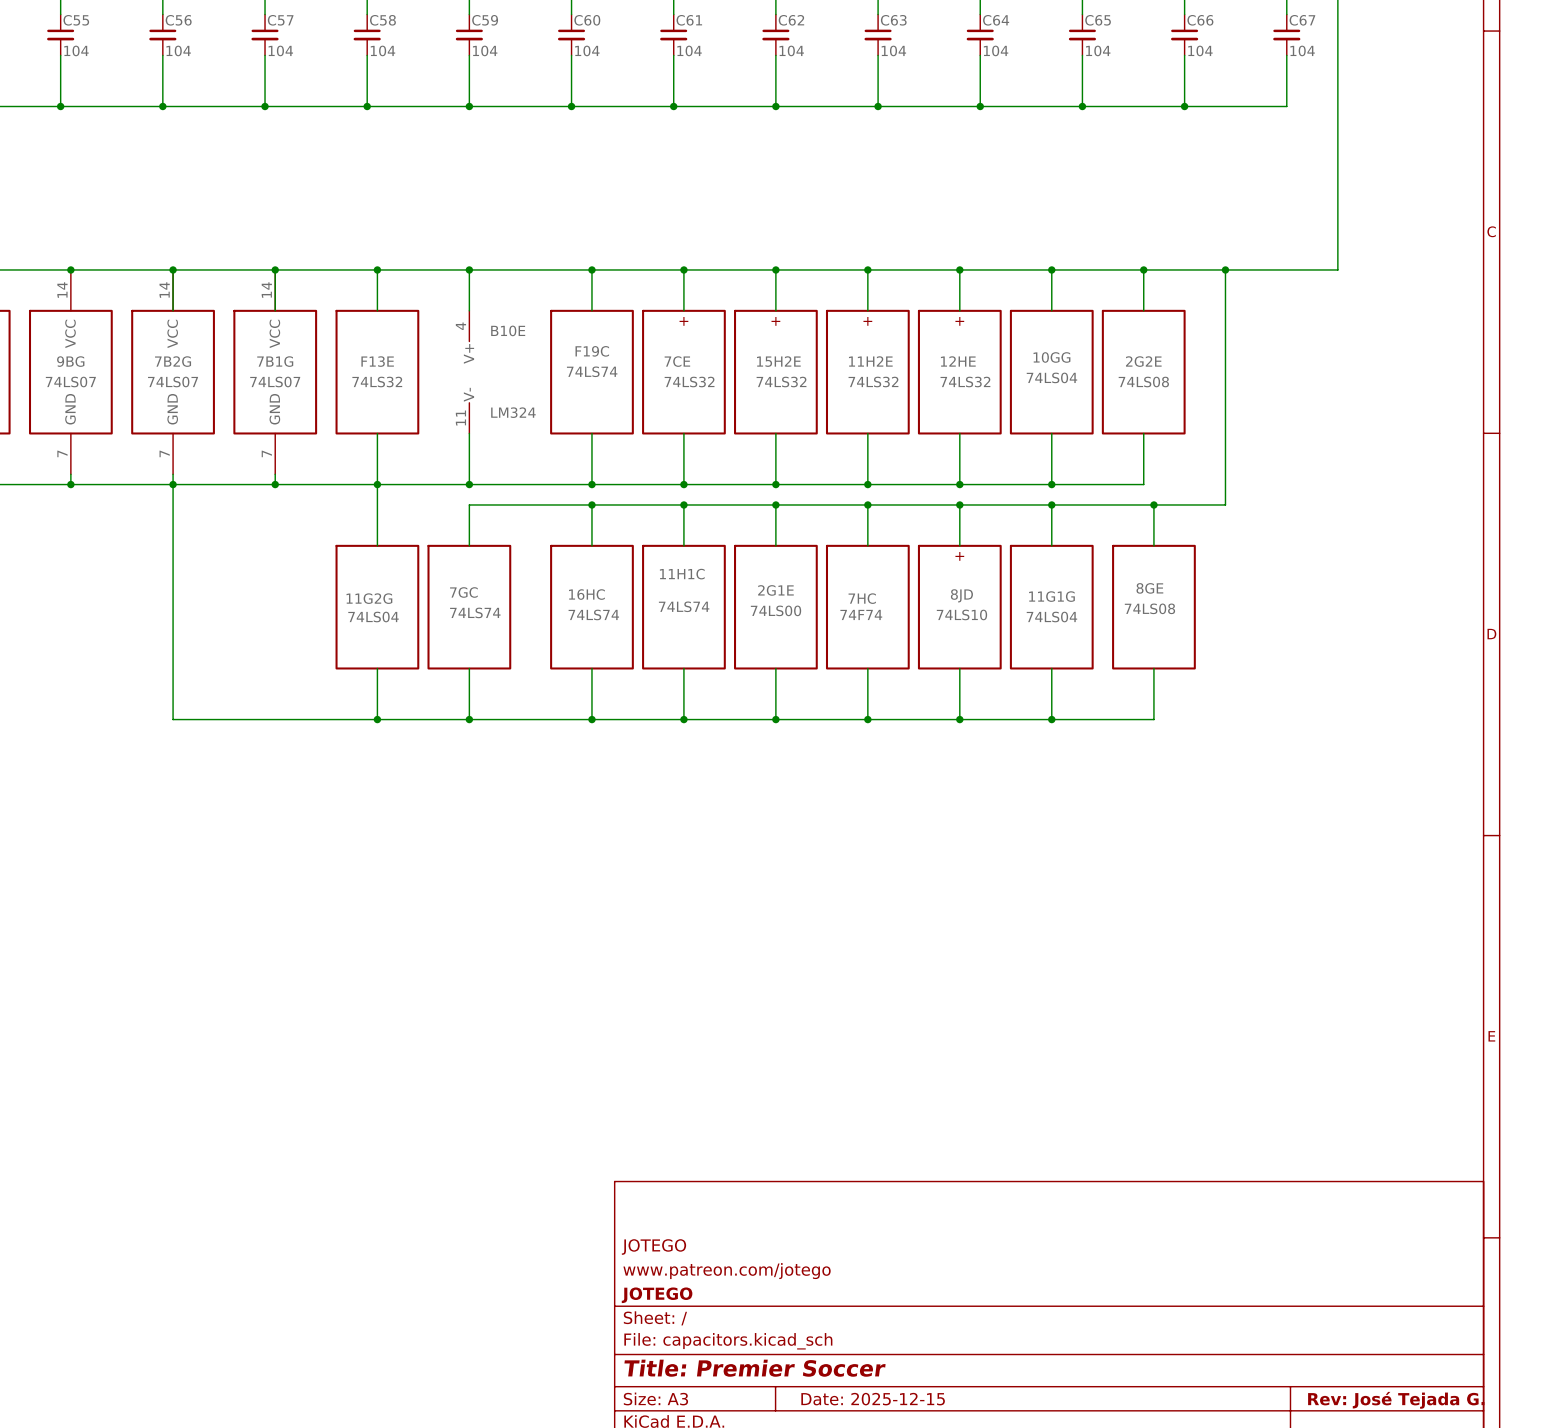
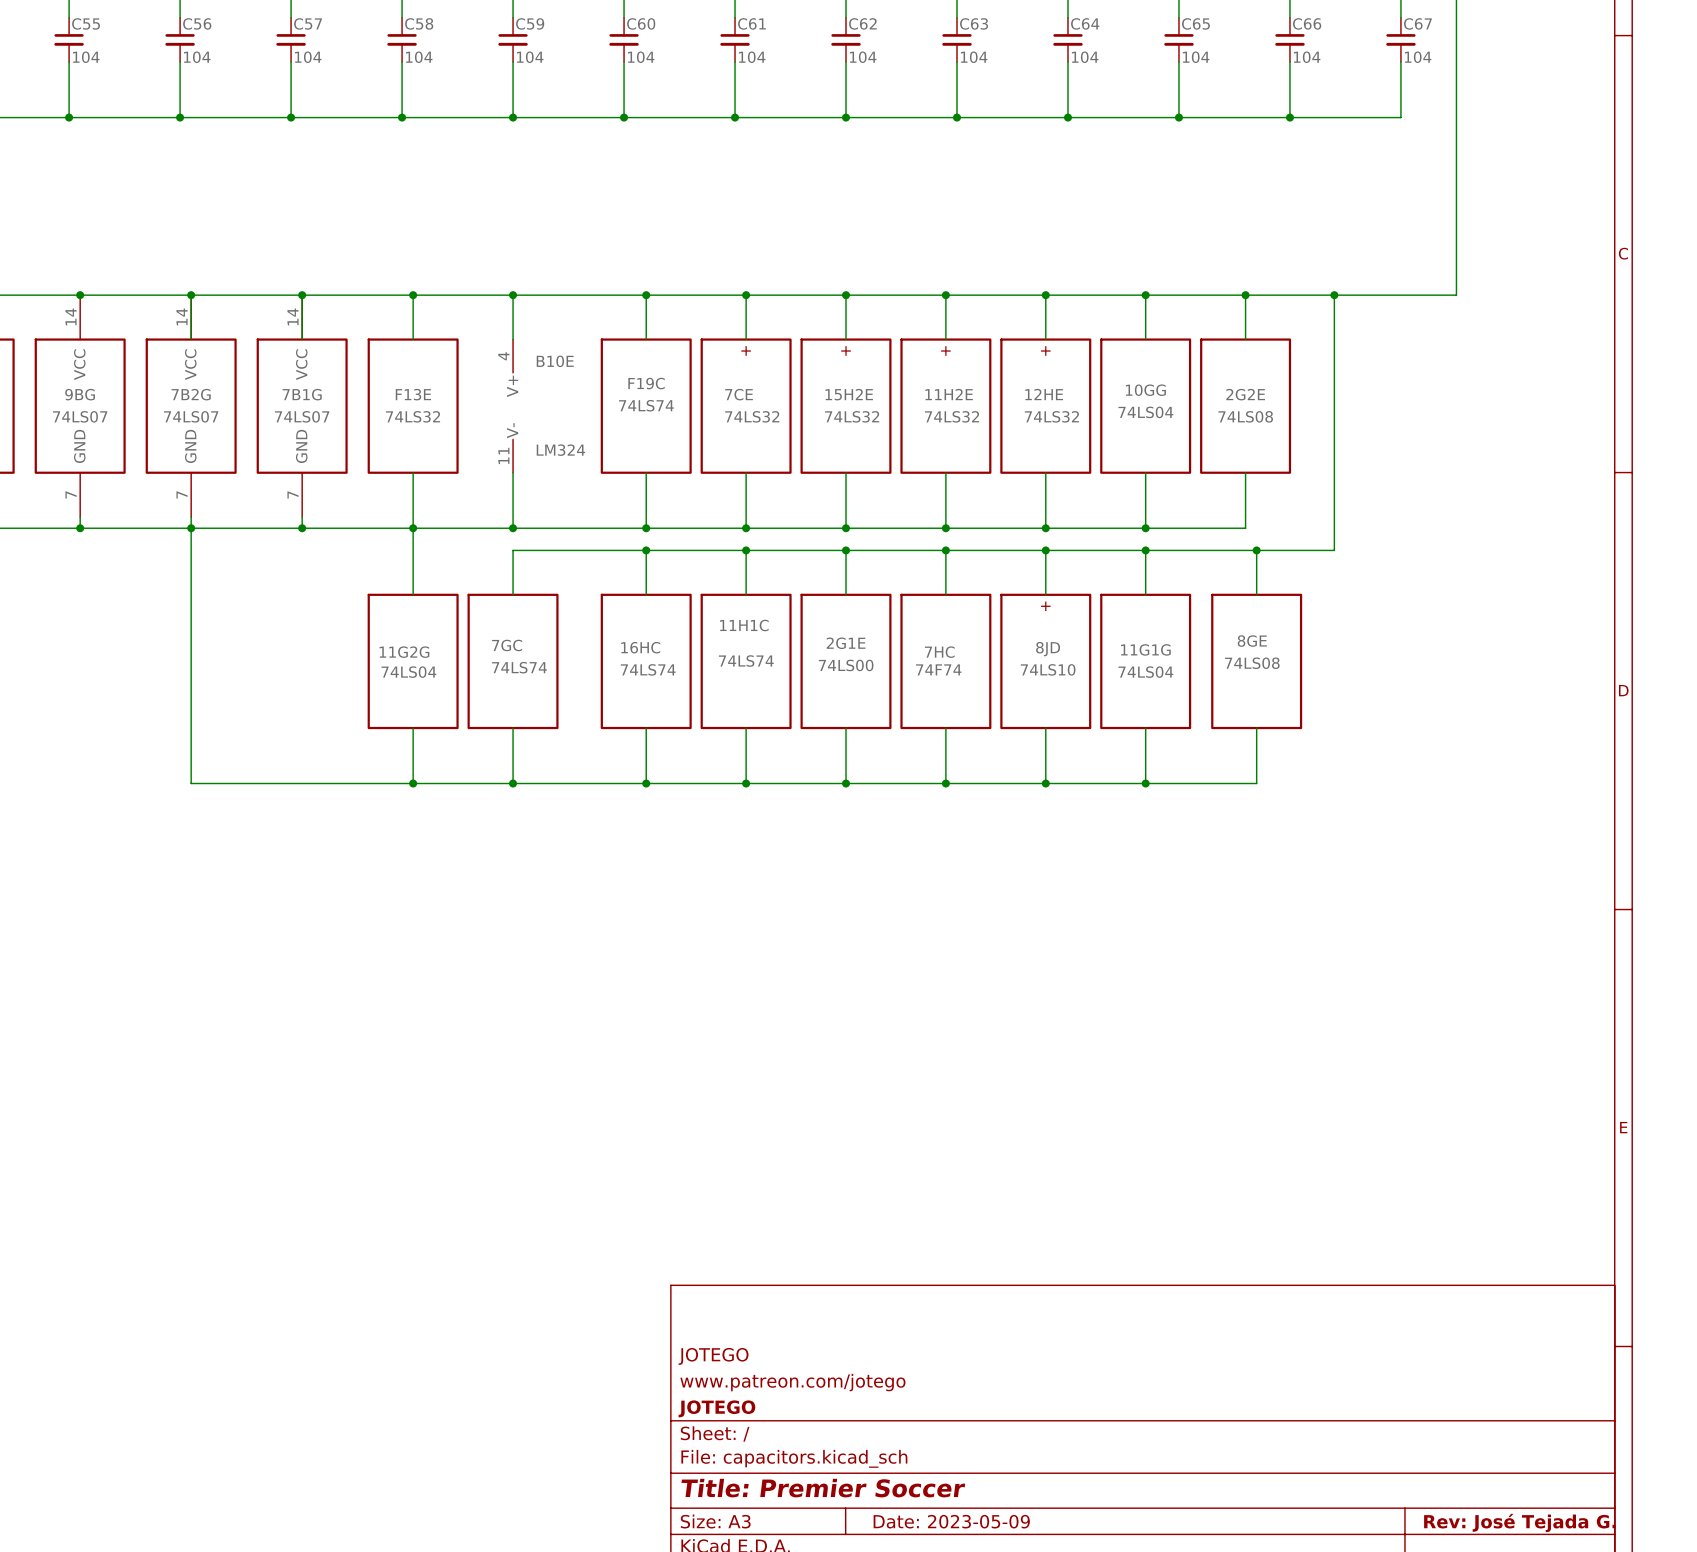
title block: Date: 2025-12-15 (873, 1399) -> Date: 2023-05-09 (951, 1521)

